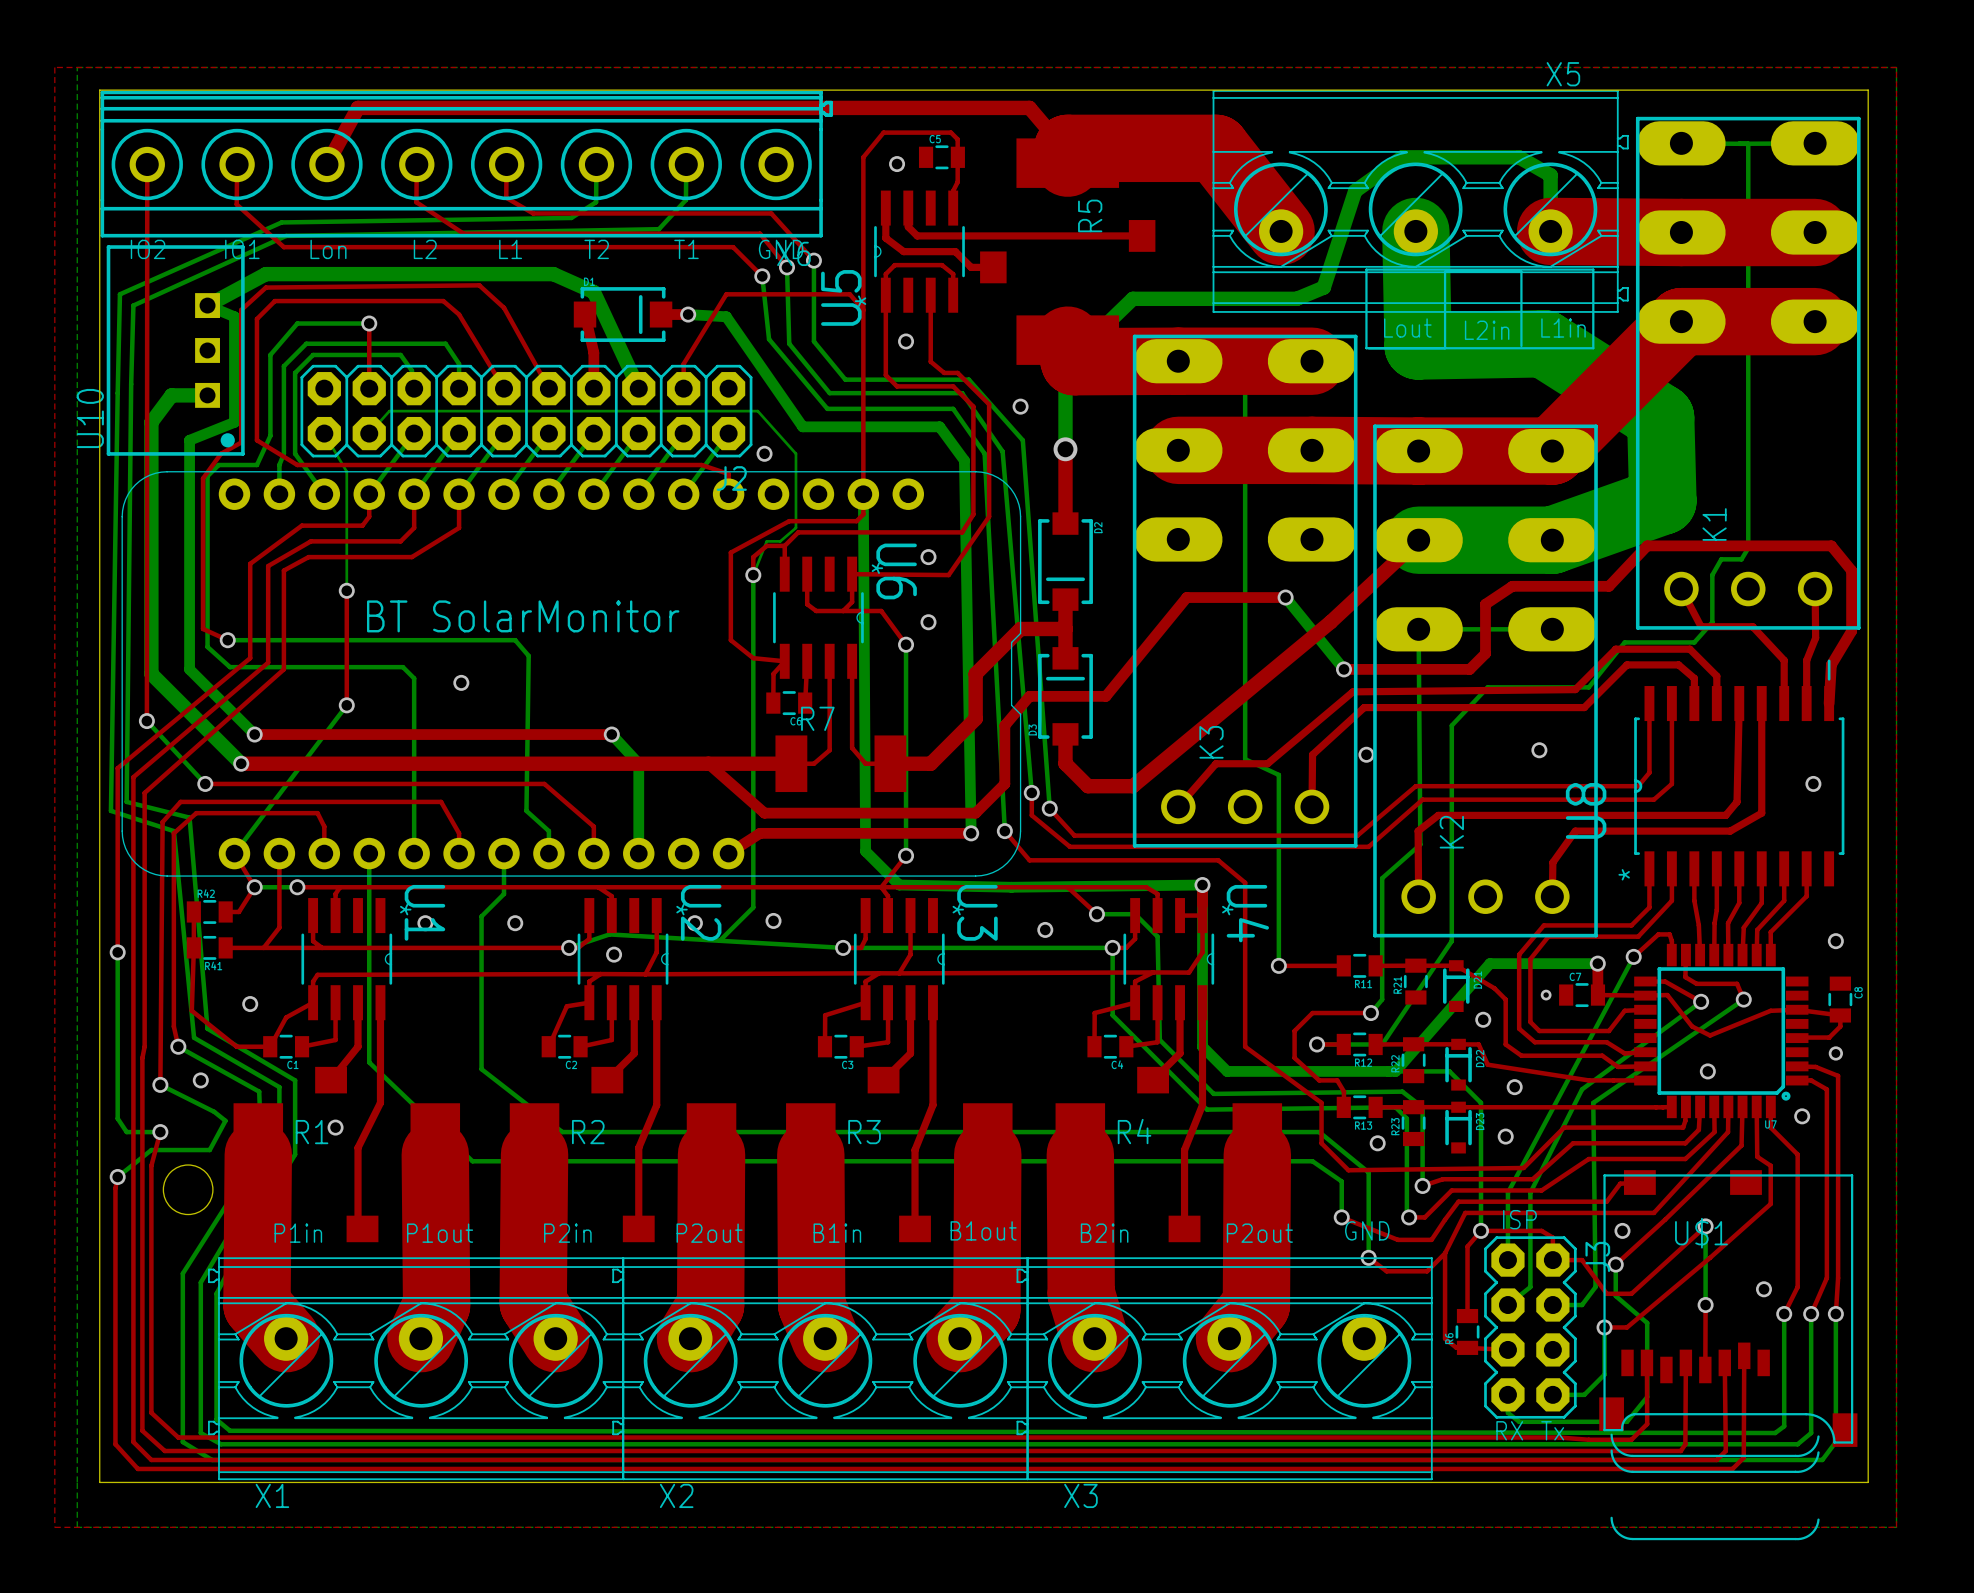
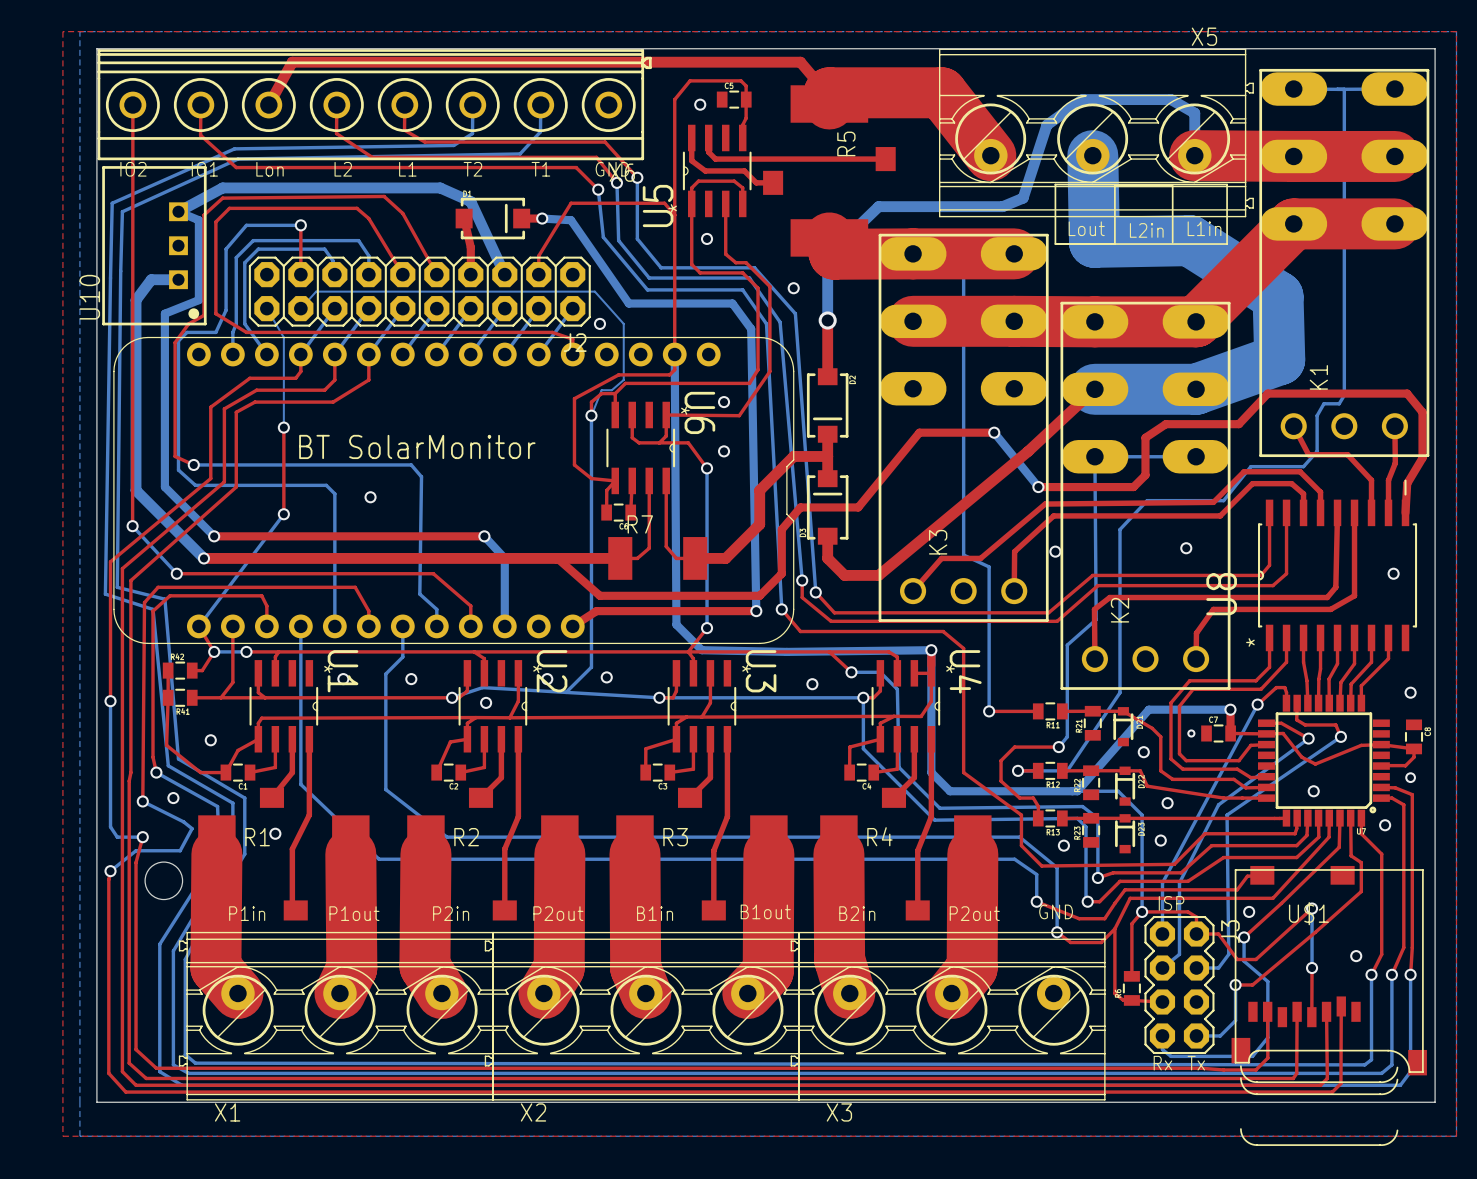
text: RX (1509, 1430) -> Rx (1162, 1063)

